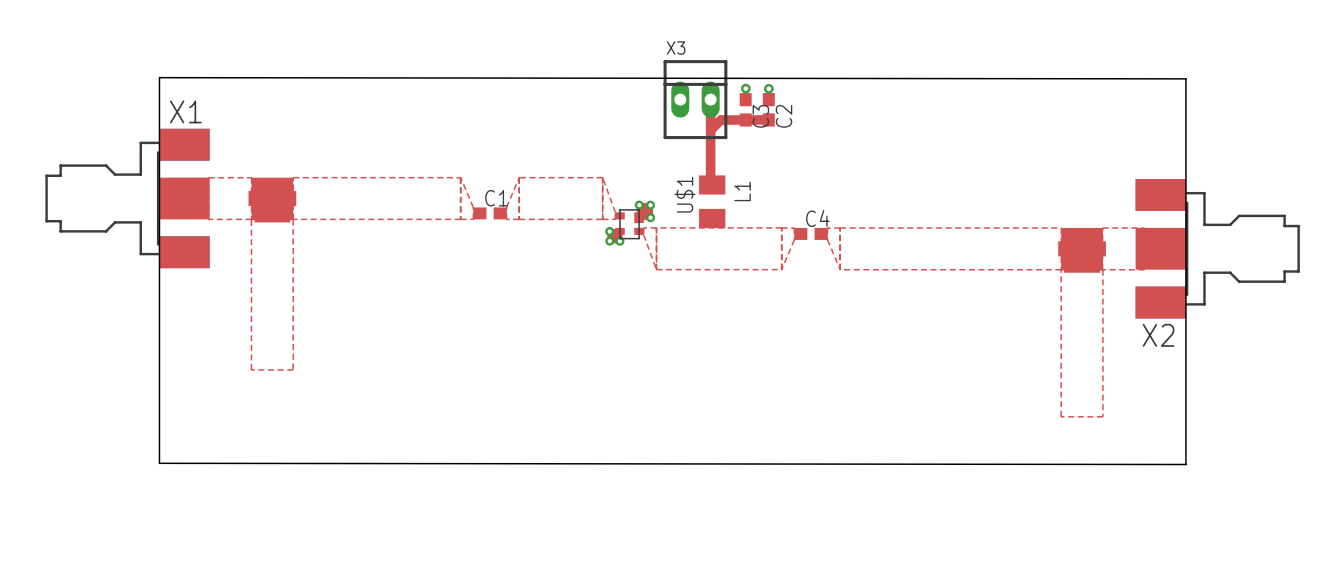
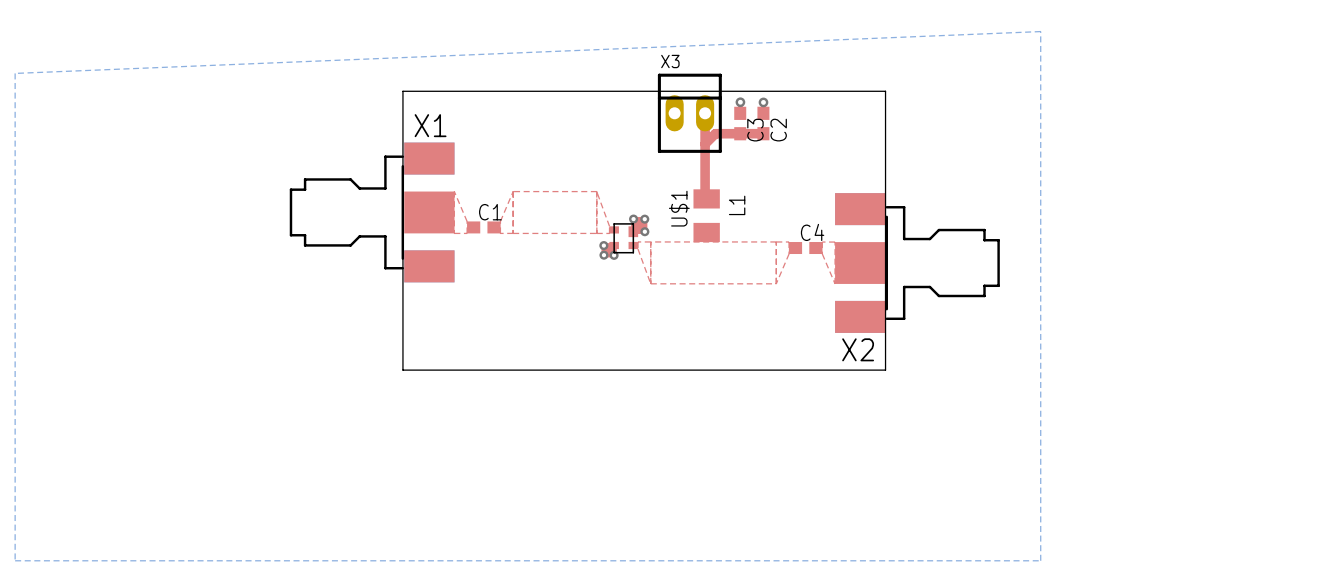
bottom zone outline: none -> (1040, 31) (1040, 560) (15, 560) (15, 73) (1040, 31)
board edge: (159, 77) (1185, 78) (1185, 464) (159, 463) (159, 77) -> none
board edge: none -> (402, 91) (885, 91) (885, 370) (402, 370) (402, 91)
top zone outline: (208, 177) (251, 177) (251, 219) (208, 219) (208, 177) -> none
top zone outline: (460, 177) (293, 177) (293, 219) -> none
X1 position: (127, 198) -> (372, 212)
part: (272, 200) -> none
top zone outline: (293, 219) (293, 370) (251, 370) (251, 219) (460, 219) -> none
X2 position: (1217, 248) -> (917, 263)
part: (1082, 250) -> none
top zone outline: (1061, 269) (1061, 416) (1102, 416) (1102, 269) -> none
top zone outline: (1061, 269) (1061, 227) (840, 227) (840, 269) (1144, 269) (1144, 228) (1102, 228) (1102, 269) -> none

